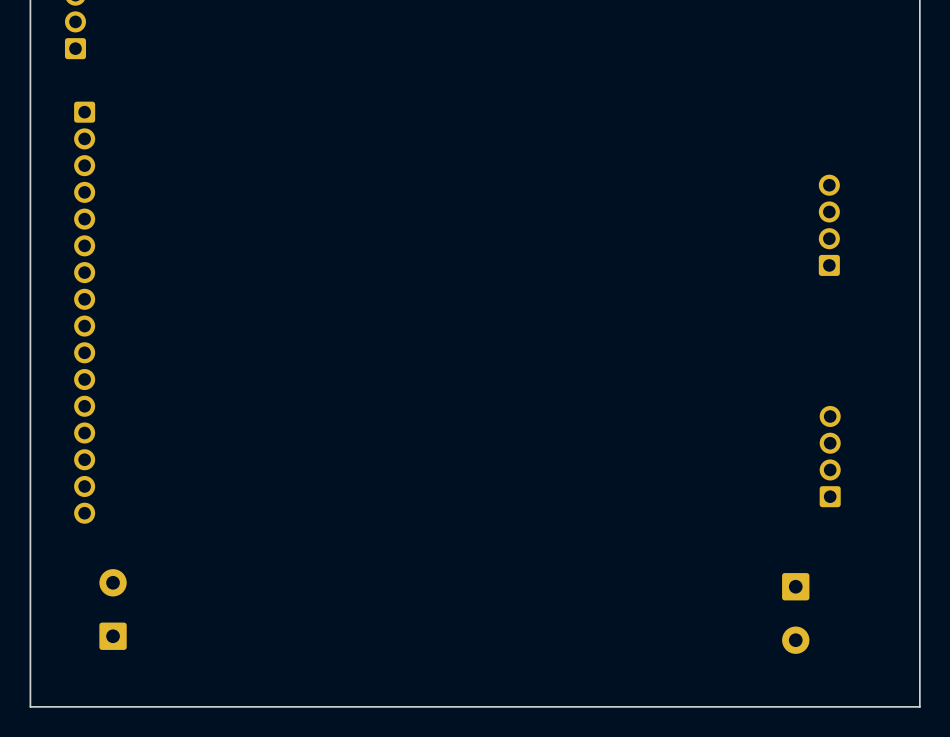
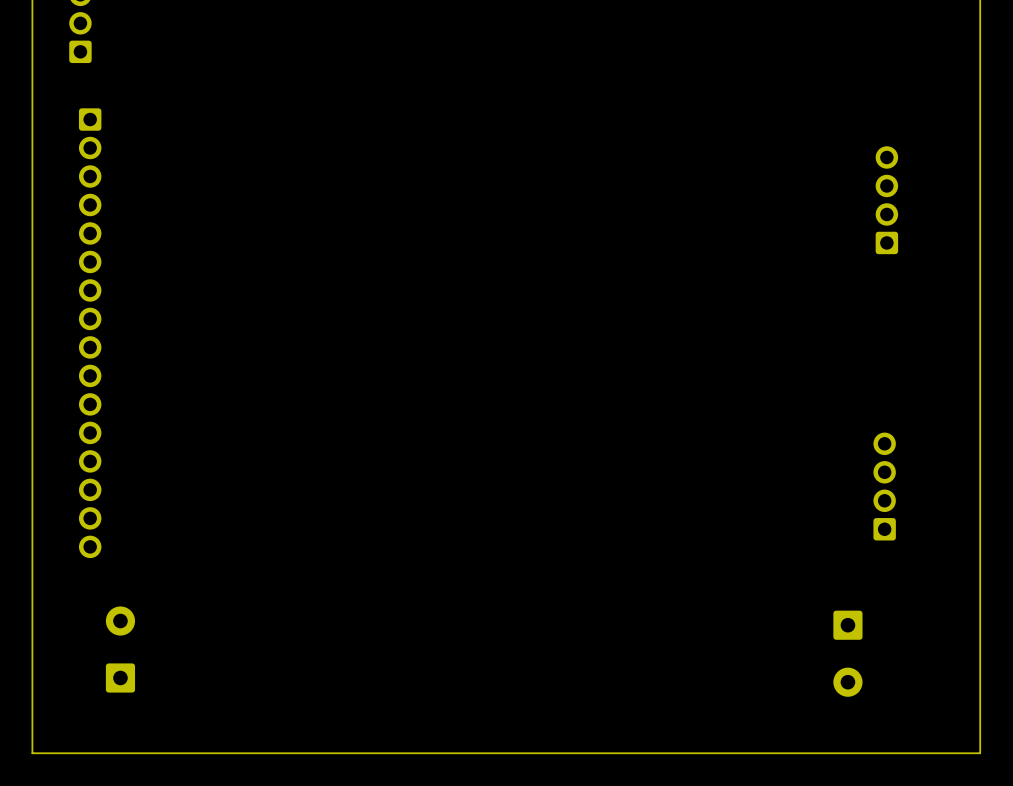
part position: (829, 225) -> (886, 200)

